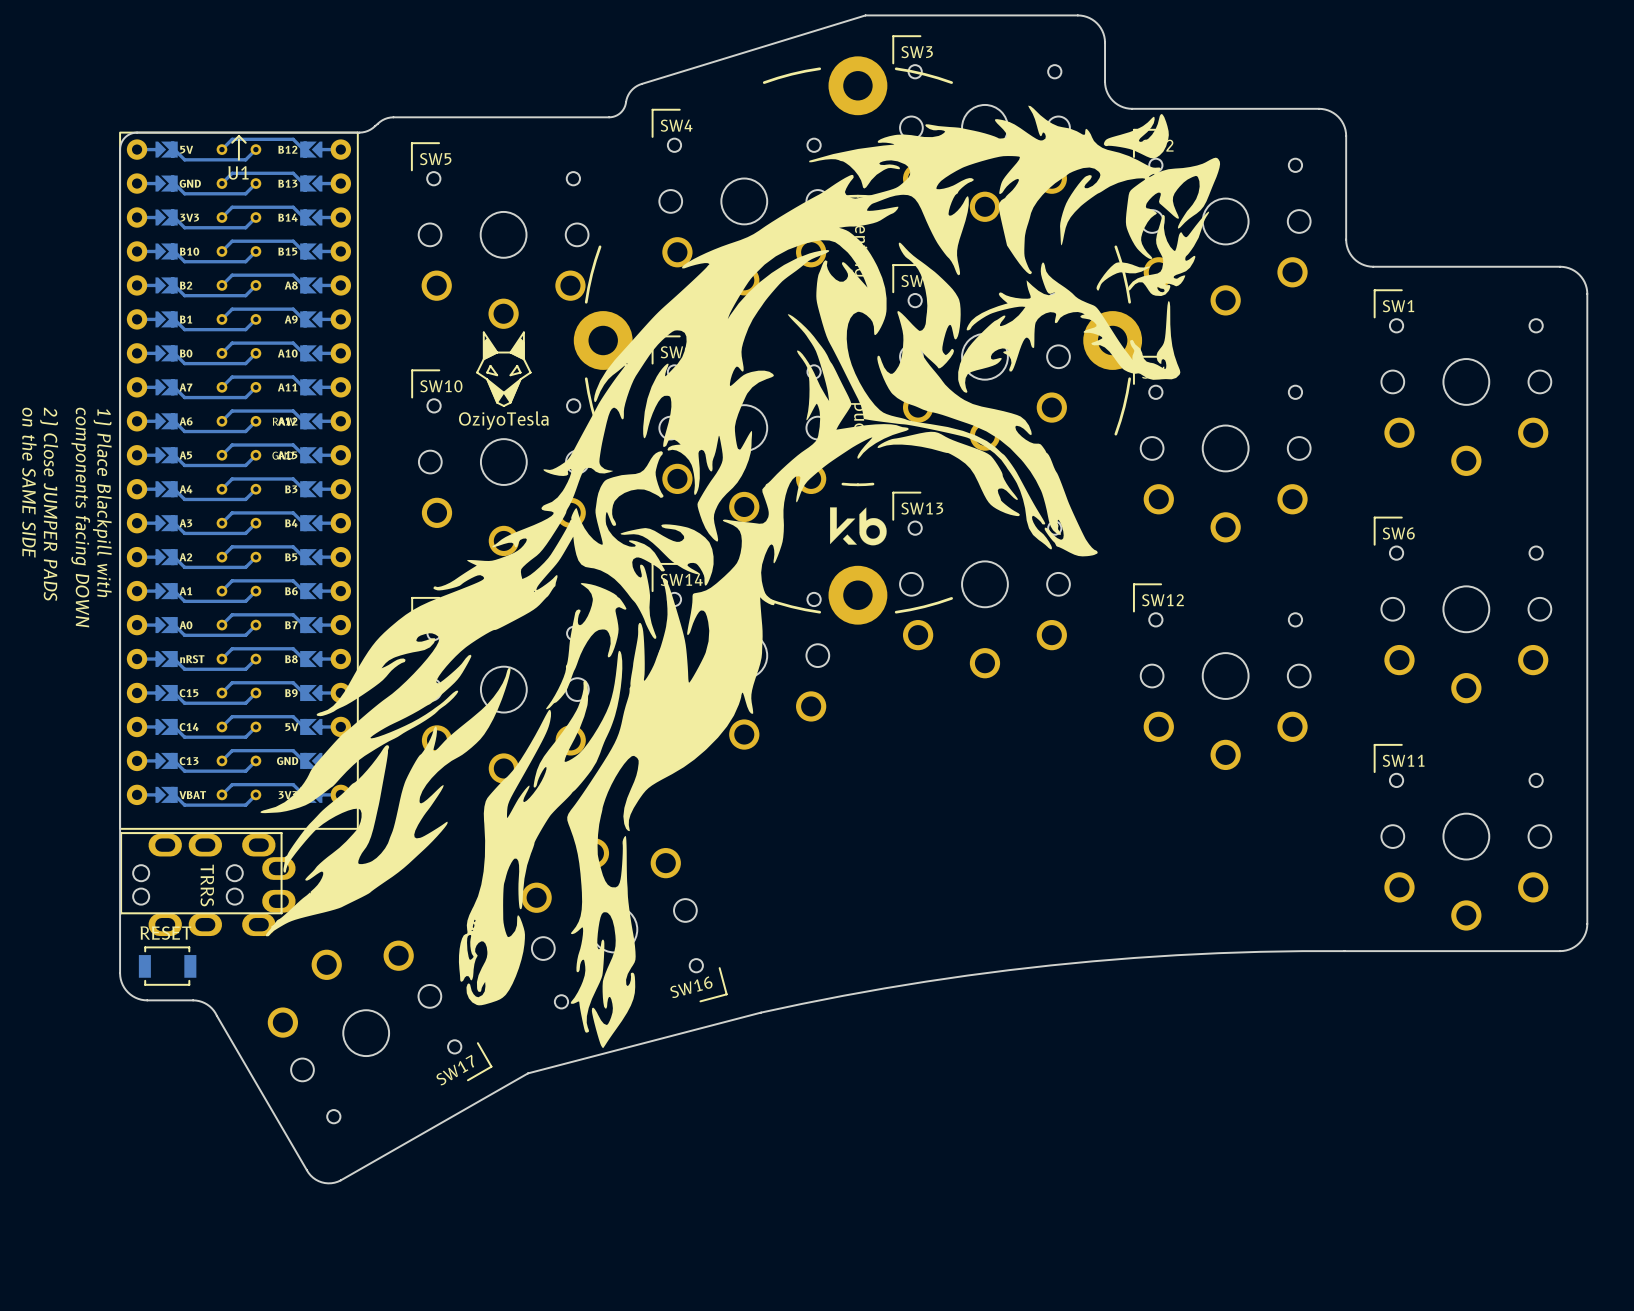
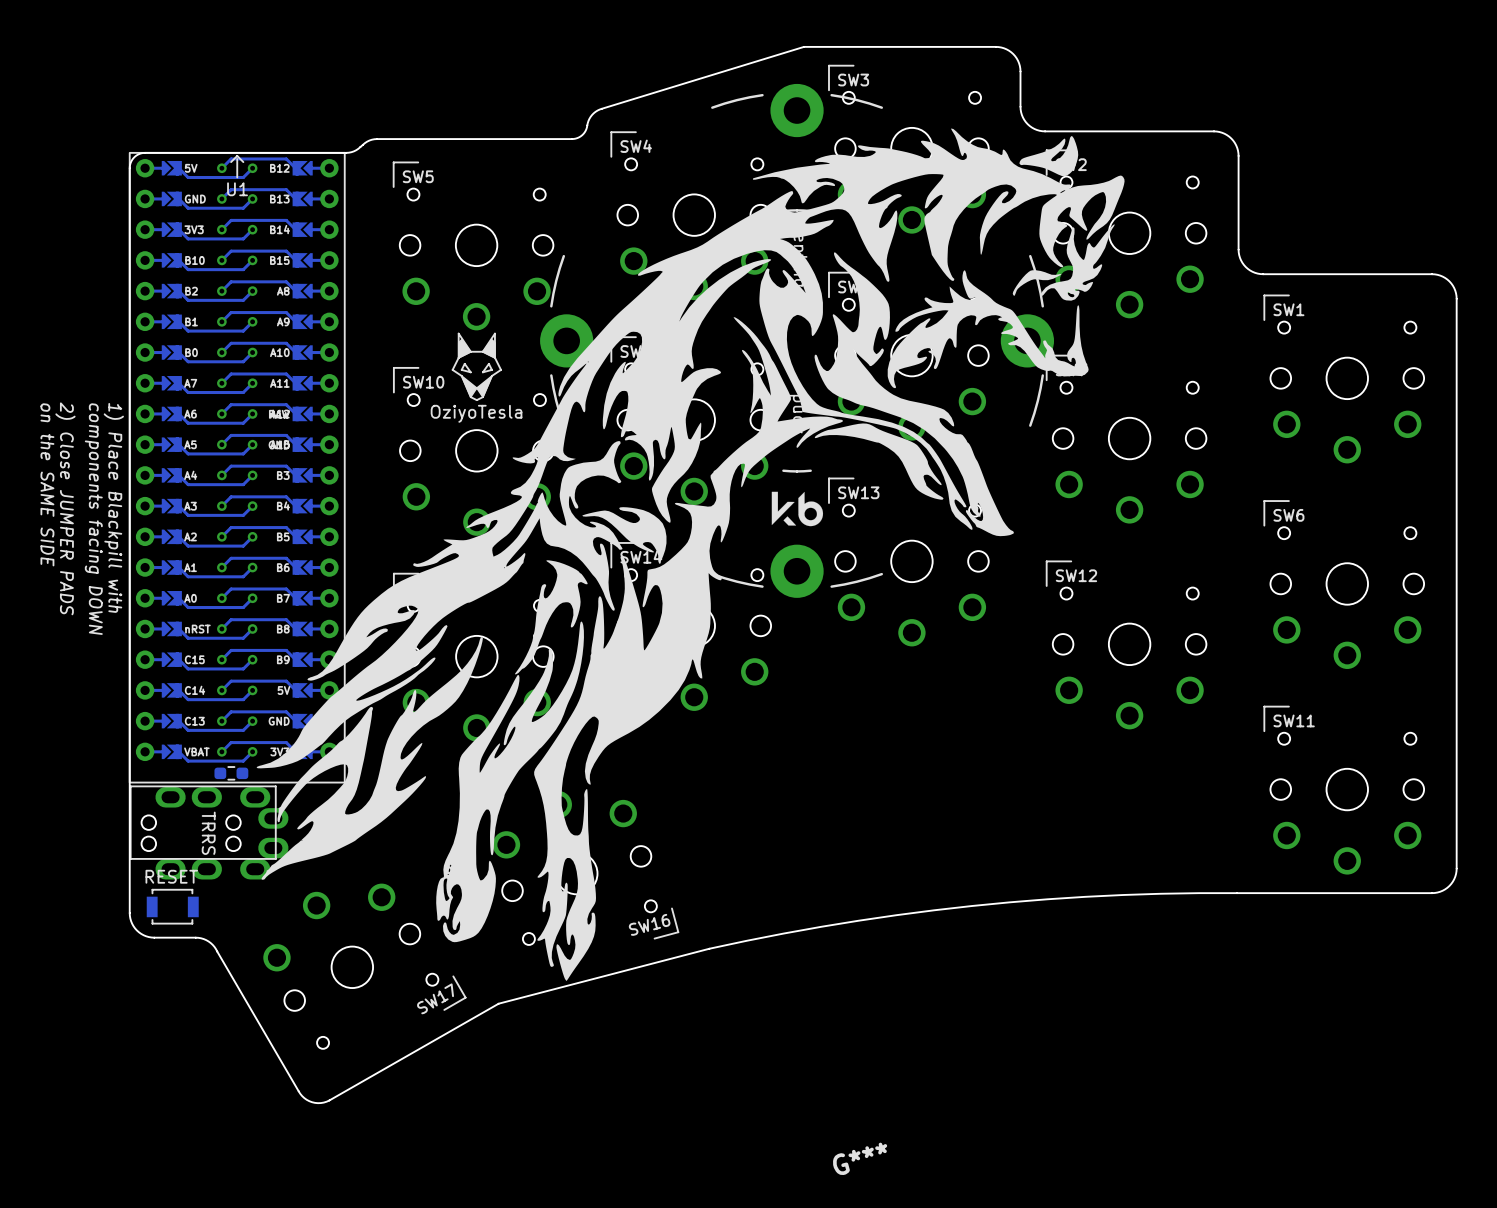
G***: none -> (690, 554)
part: none -> (231, 773)

